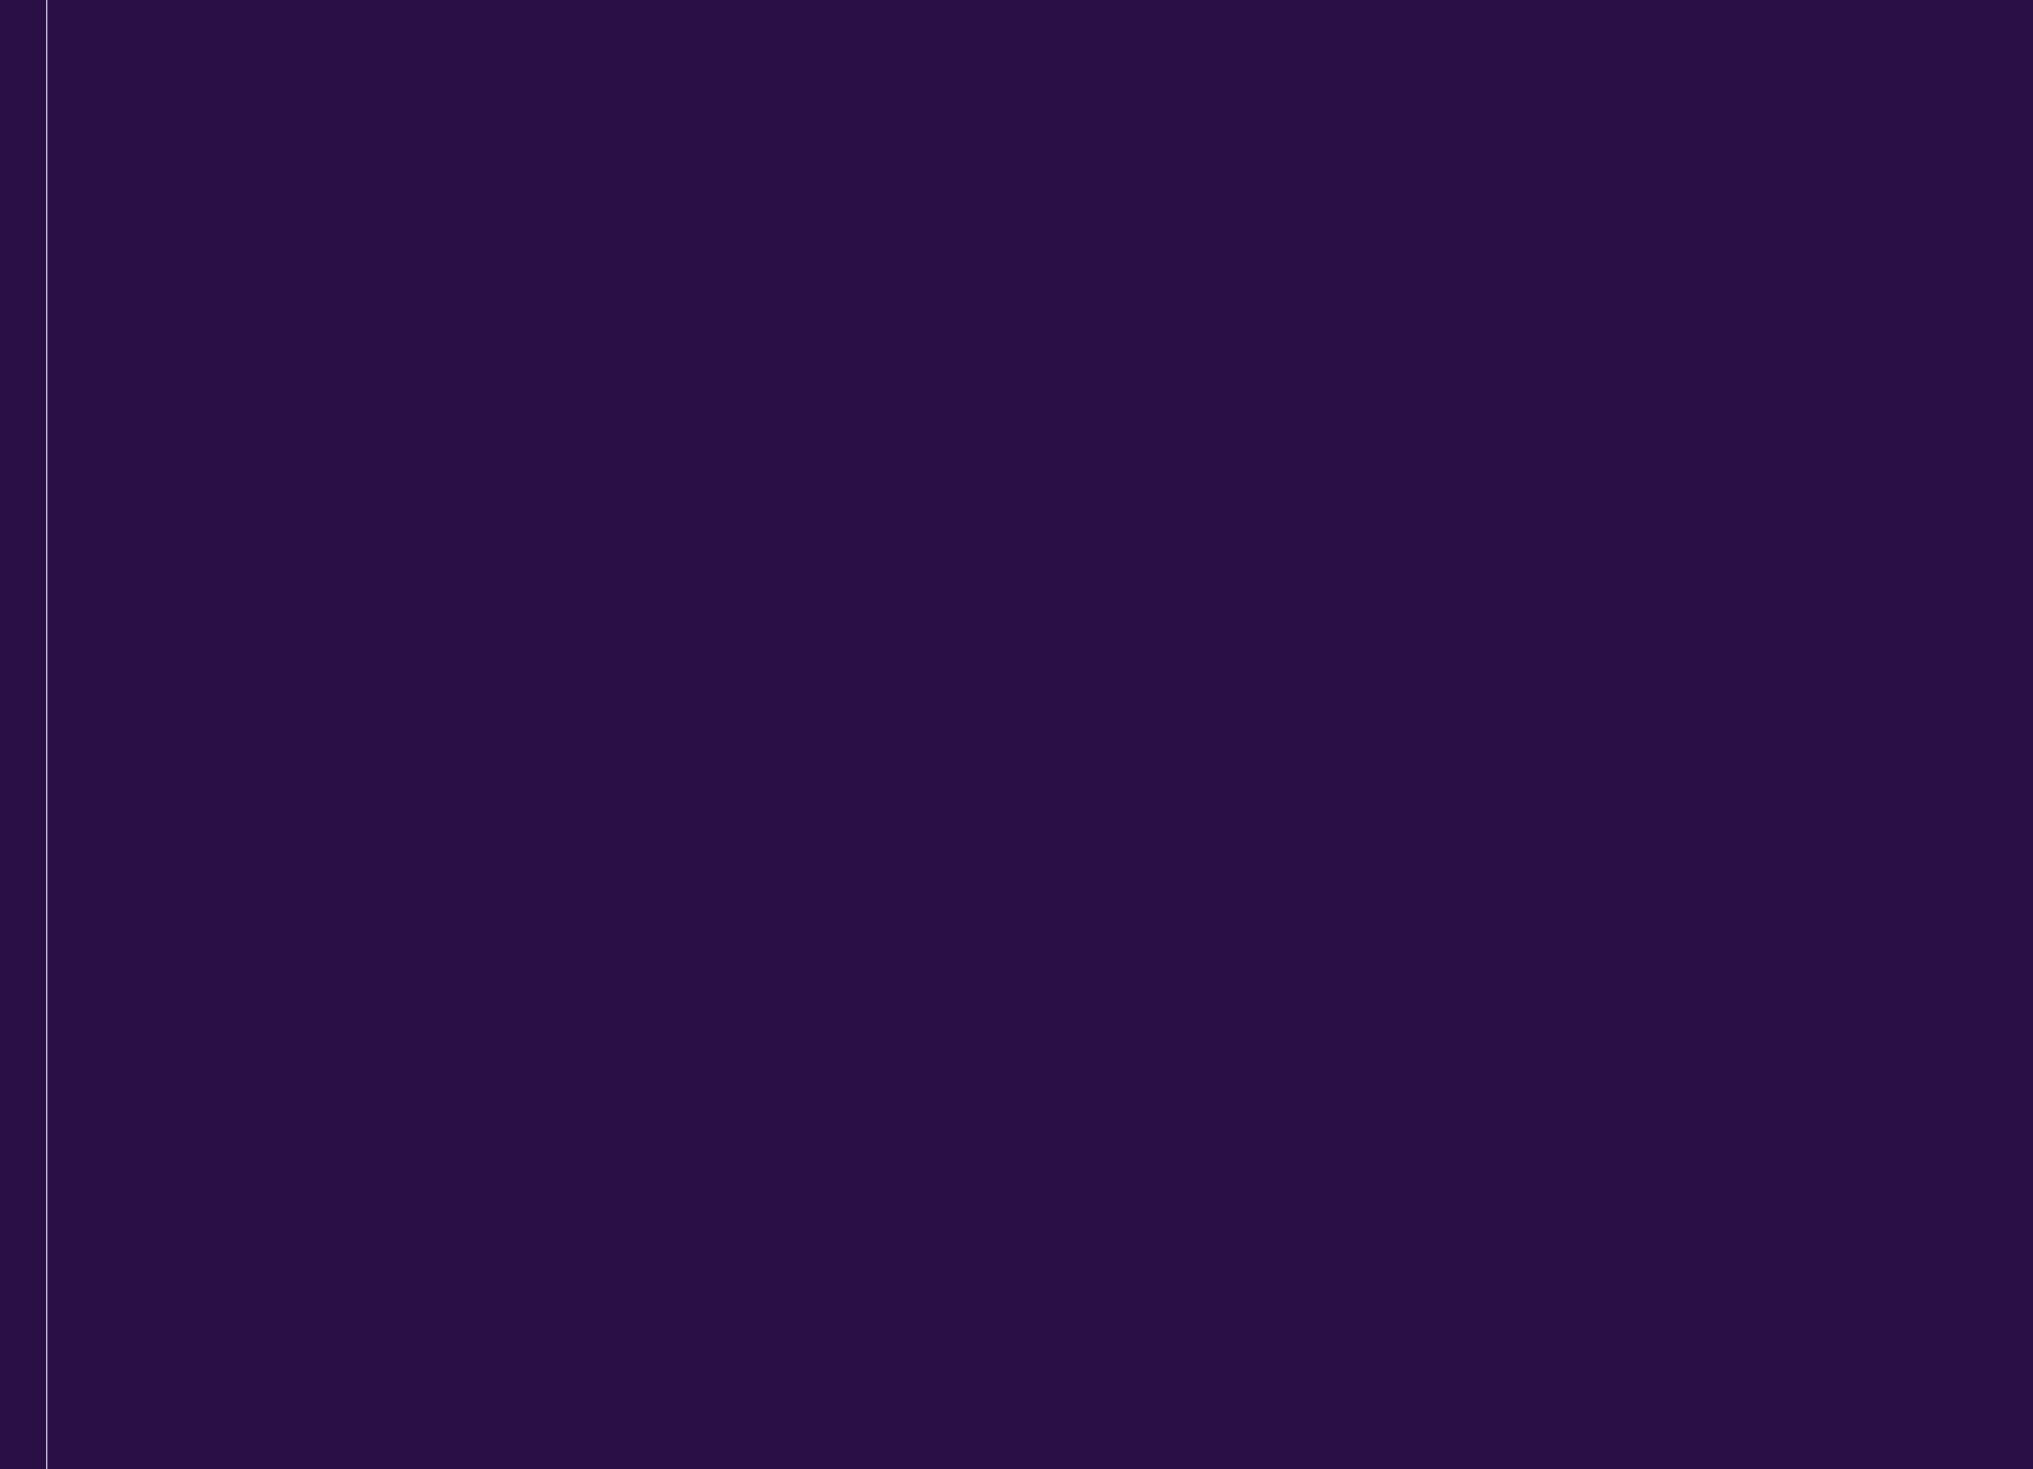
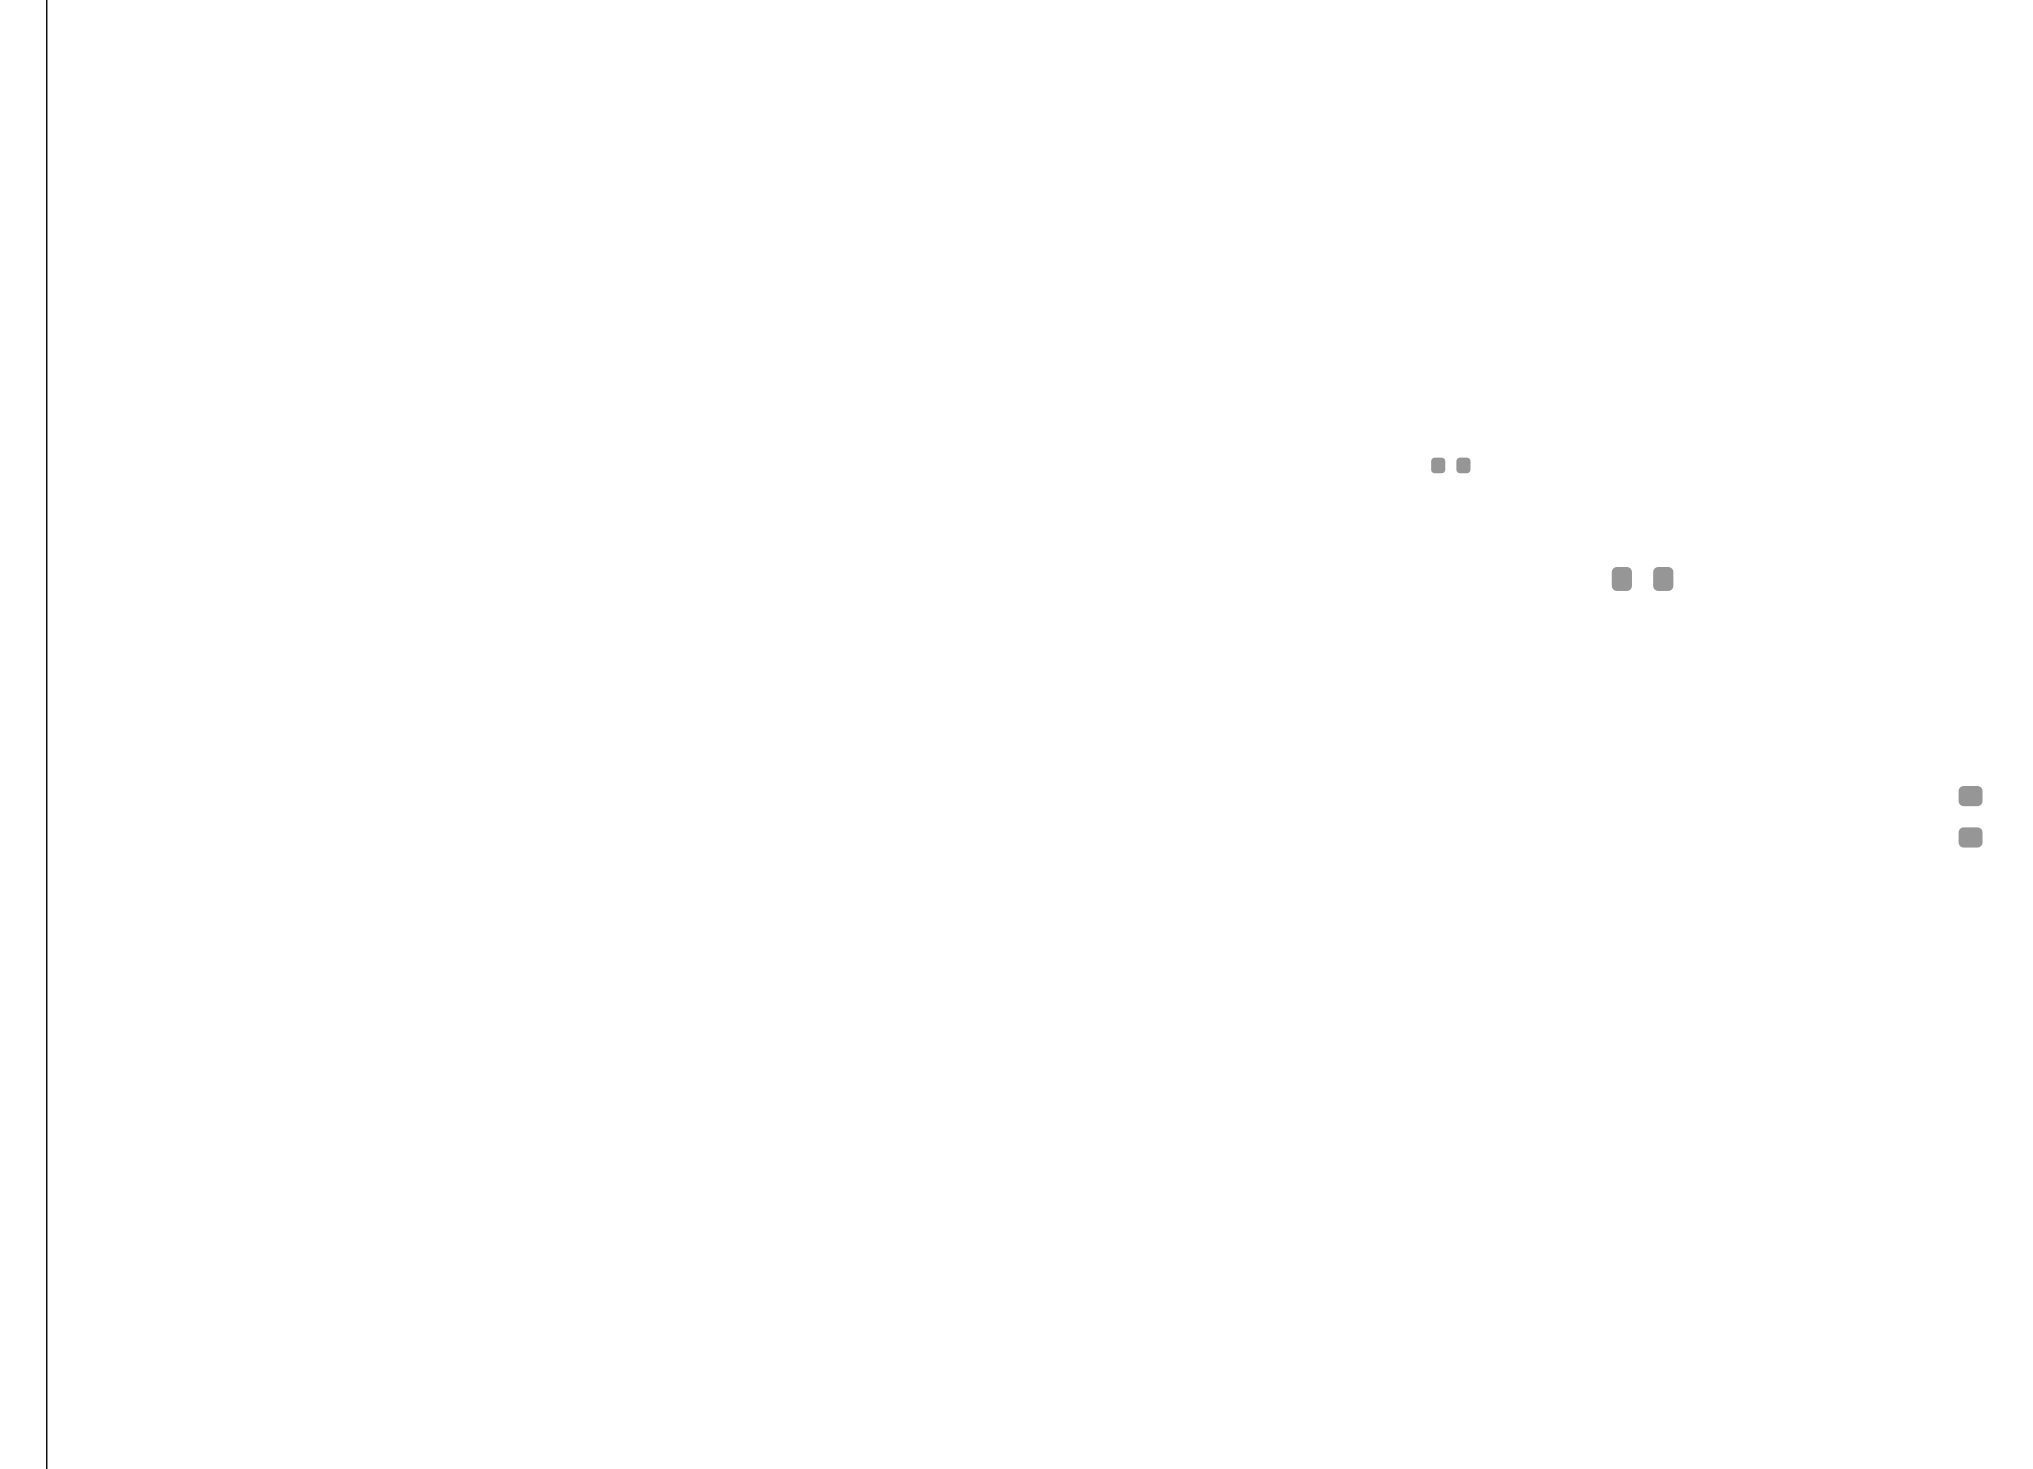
part: none -> (1450, 465)
part: none -> (1642, 578)
part: none -> (1970, 816)

